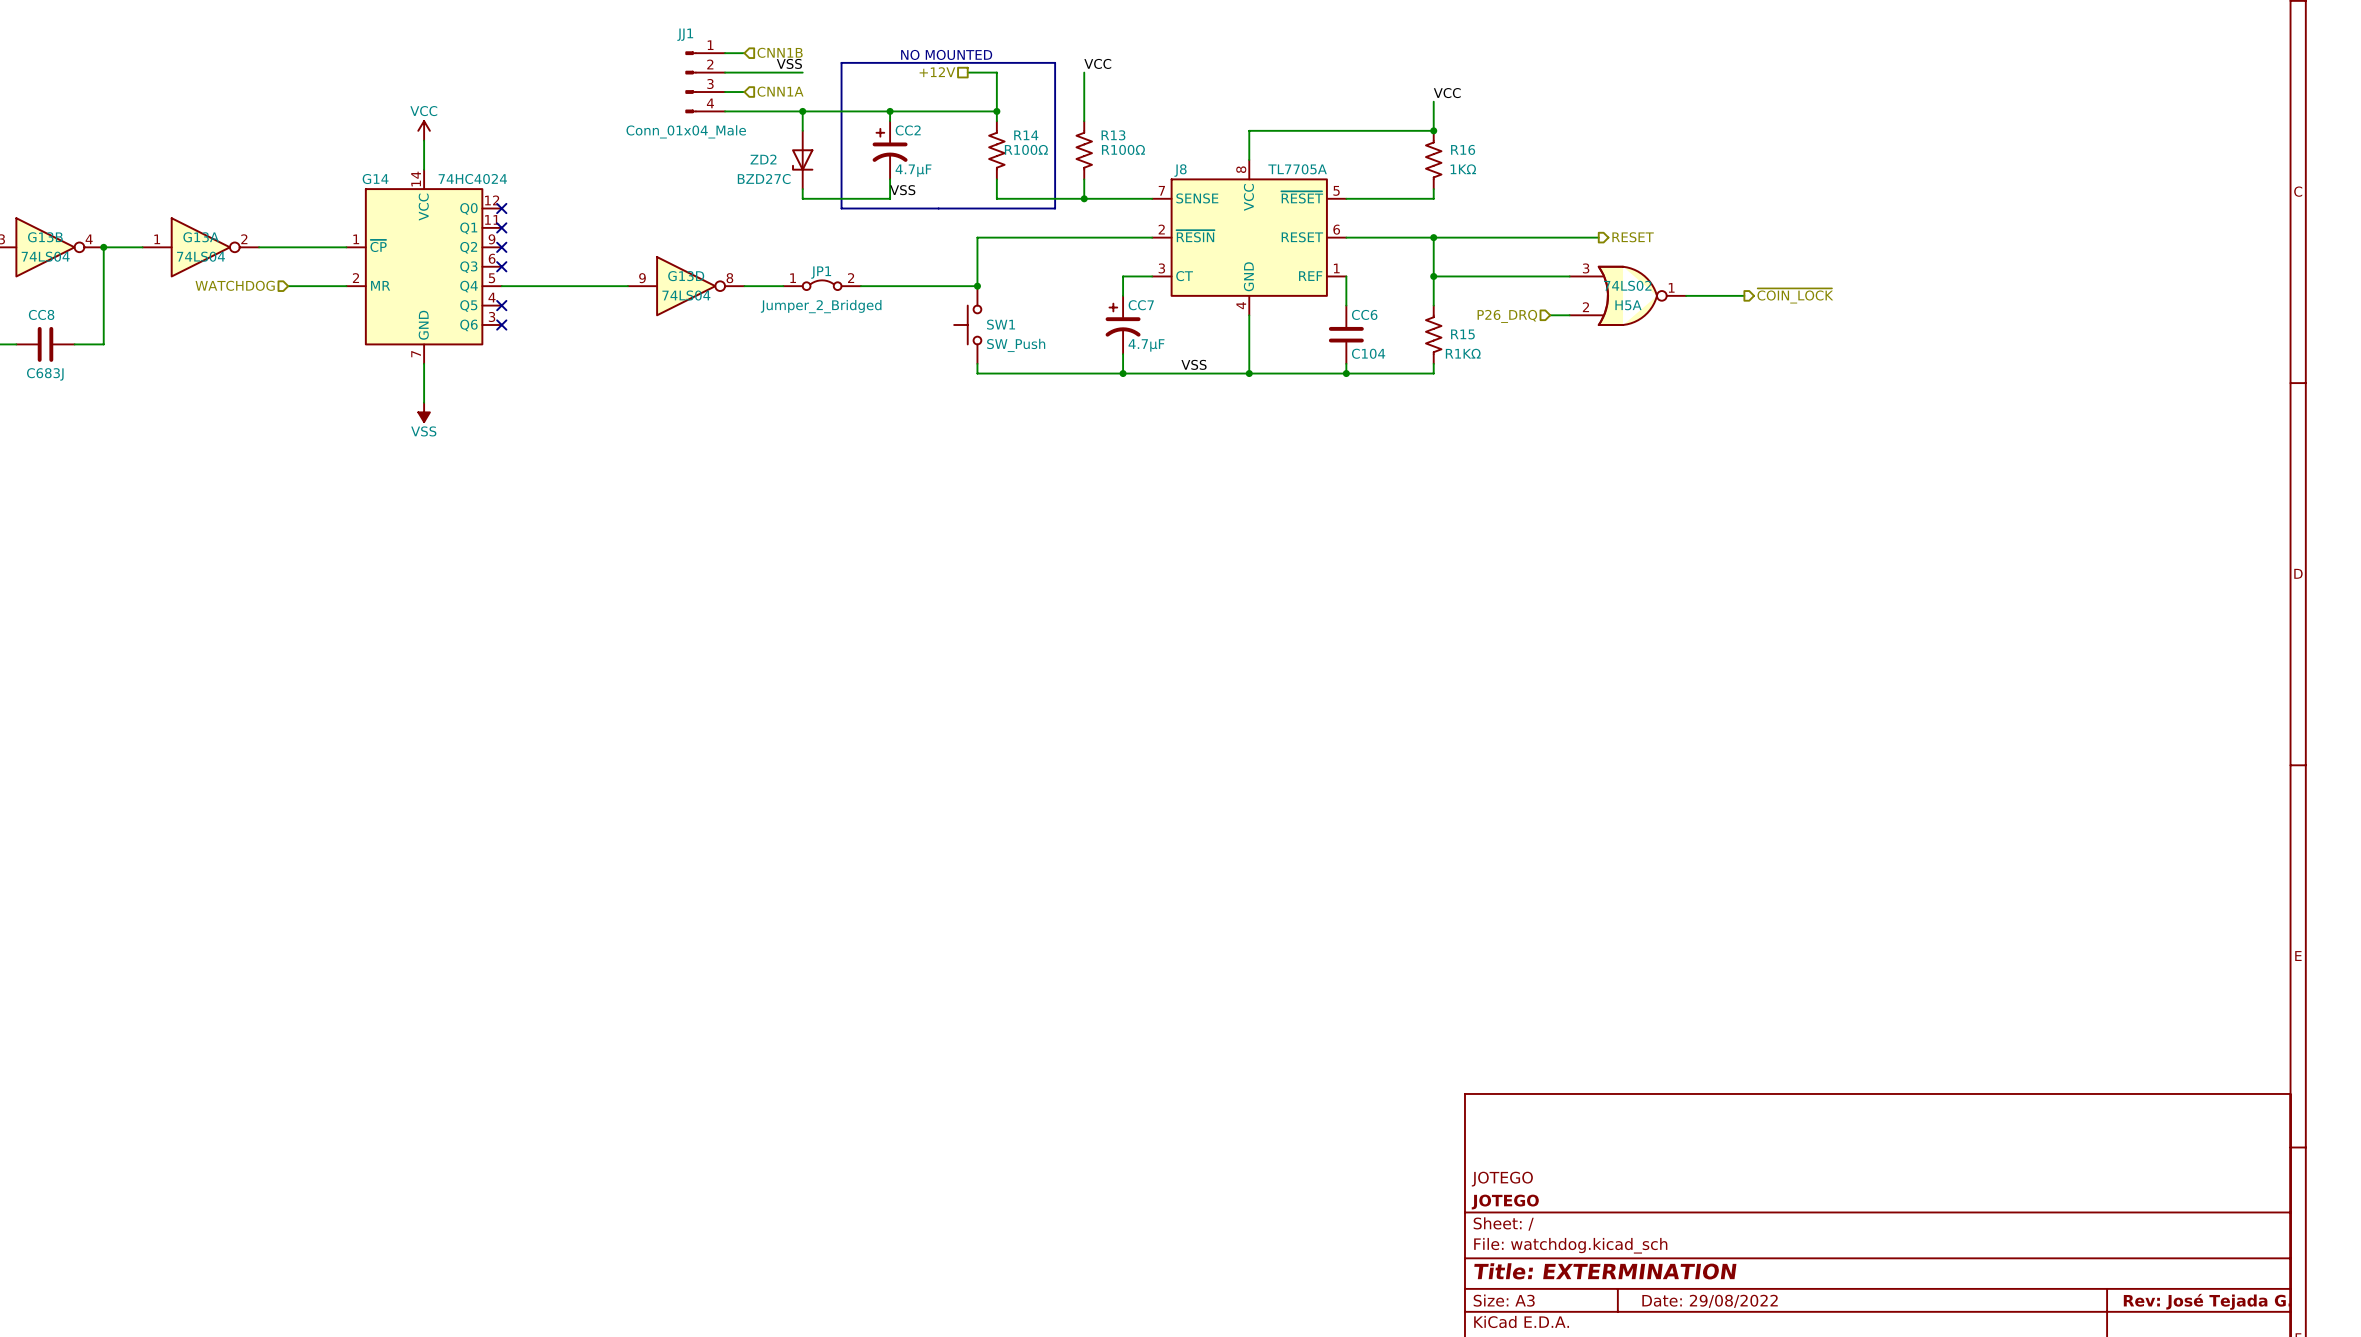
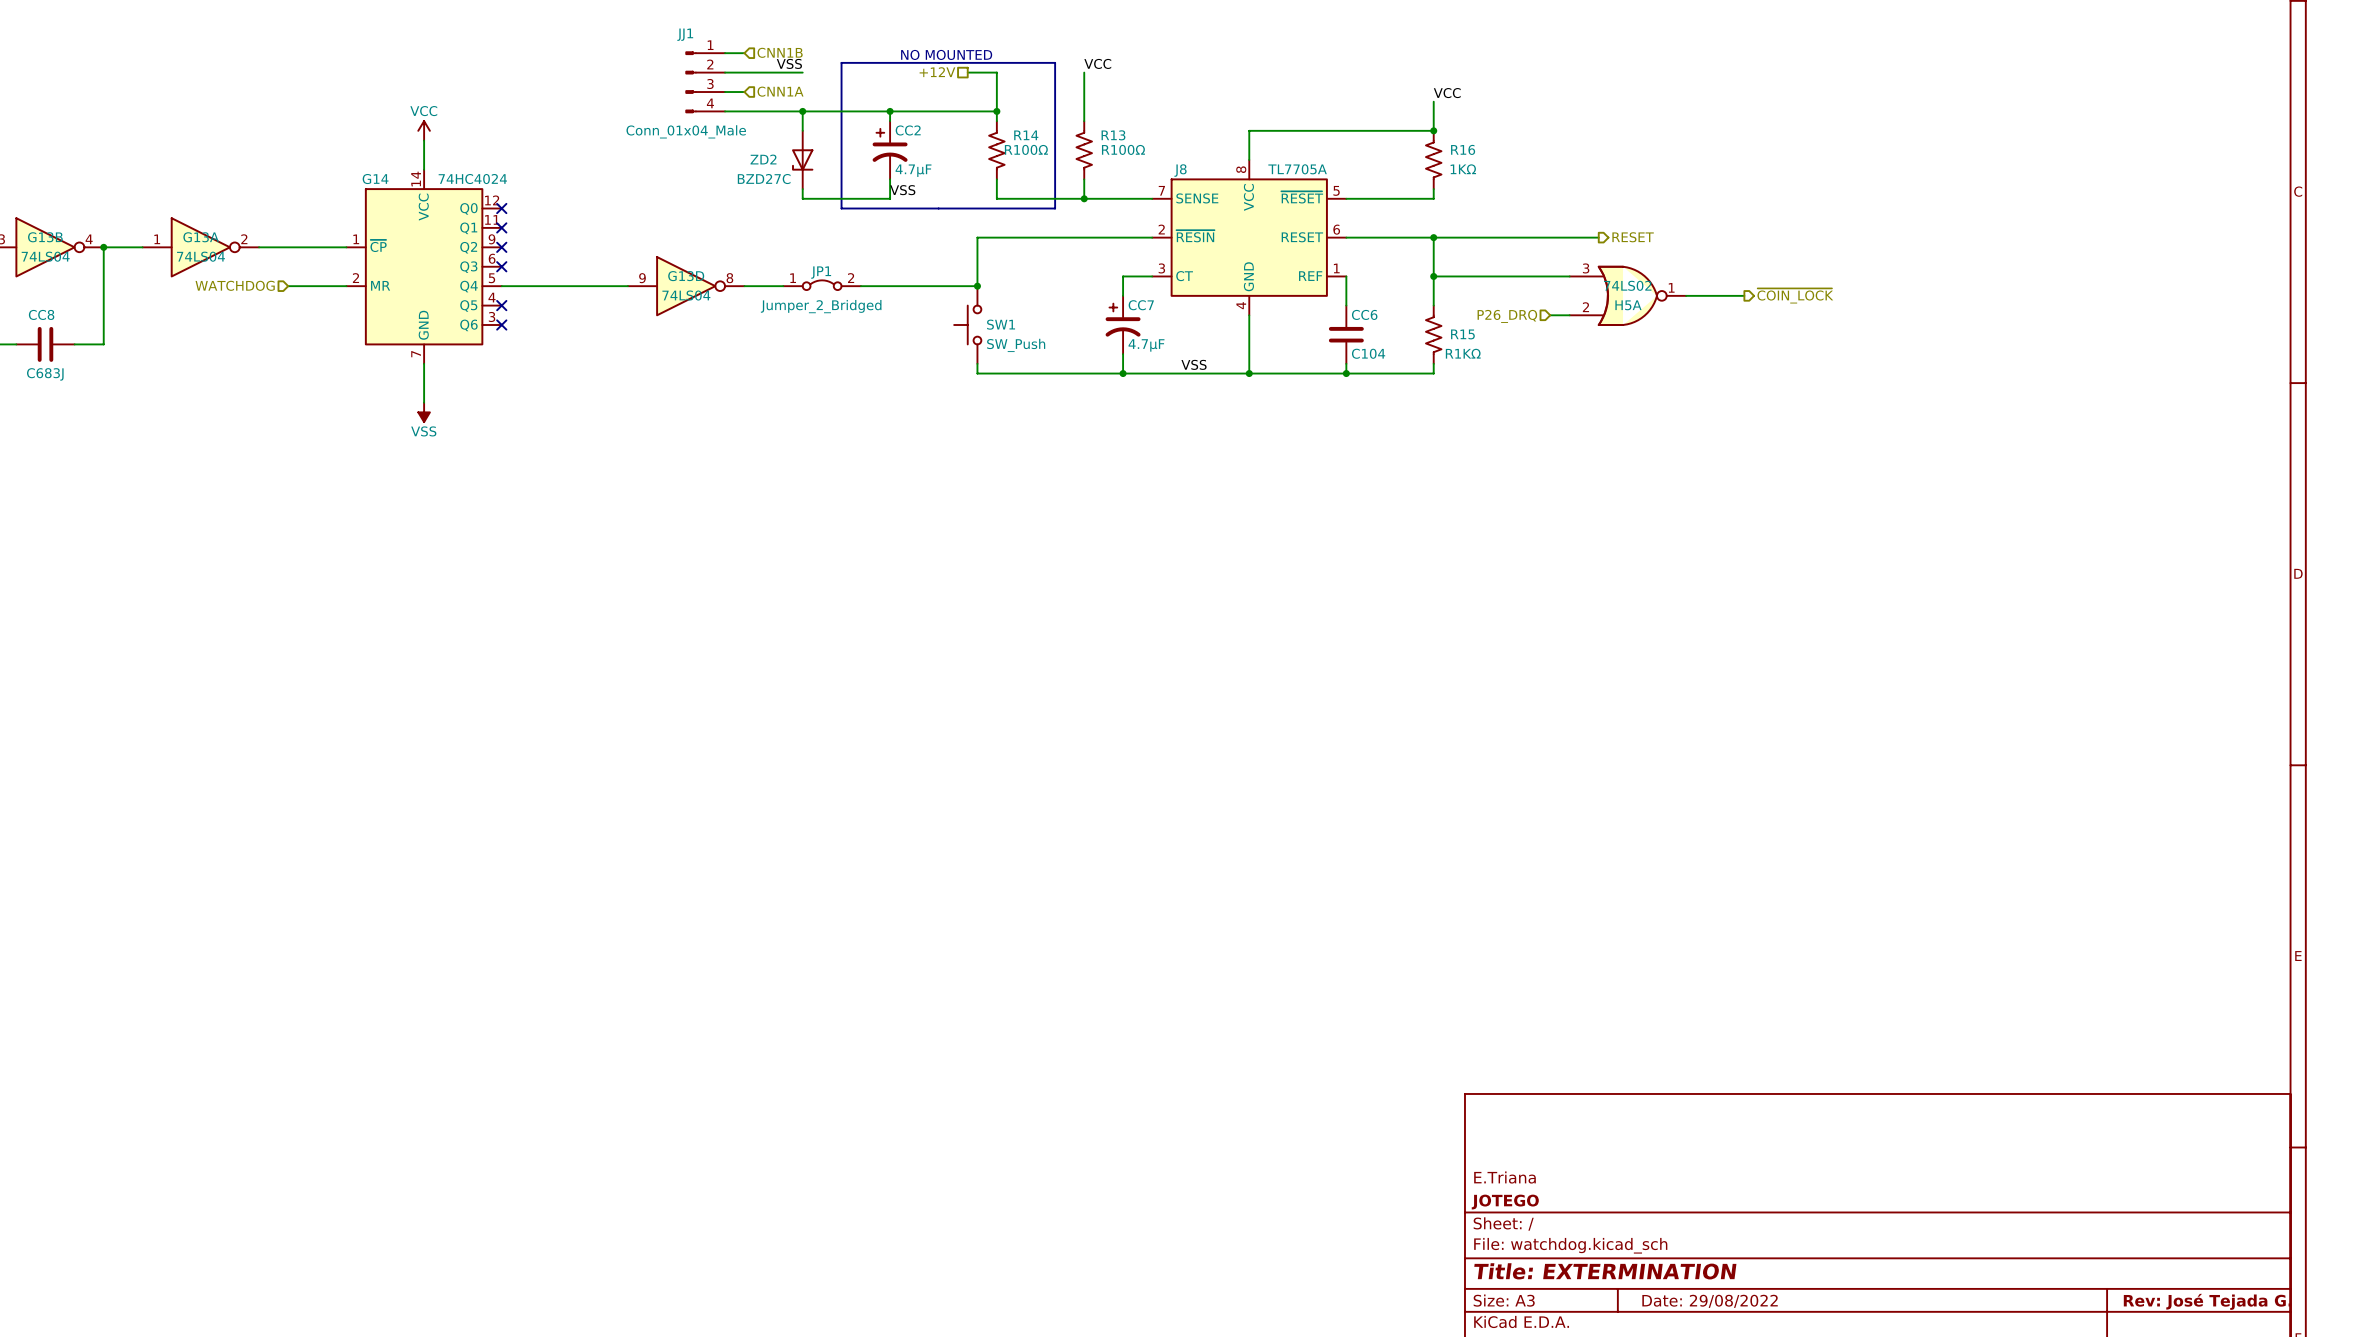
title block: JOTEGO (1502, 1179) -> E.Triana (1505, 1177)

